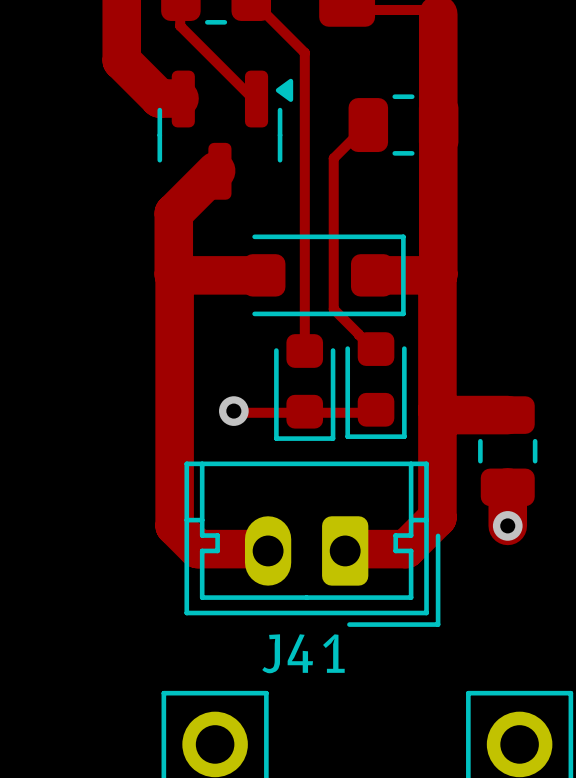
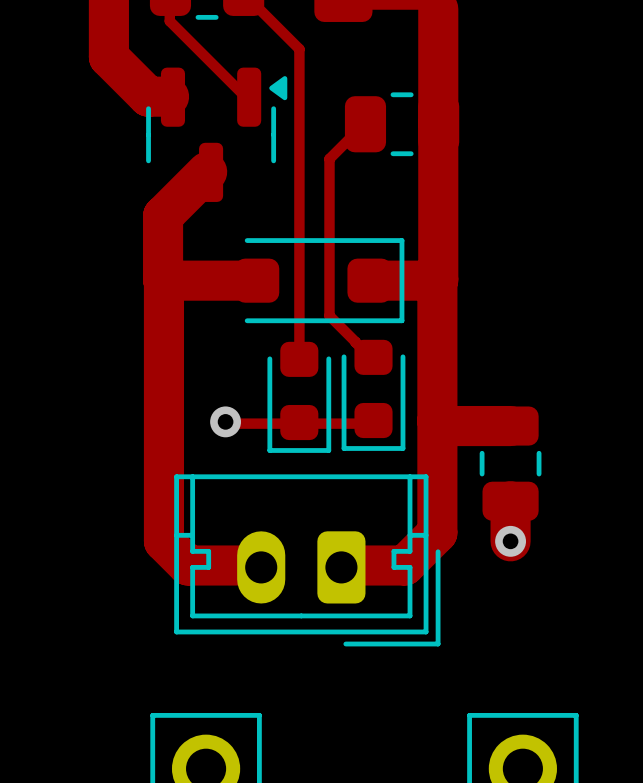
J41 name: J41 (303, 653) -> none

